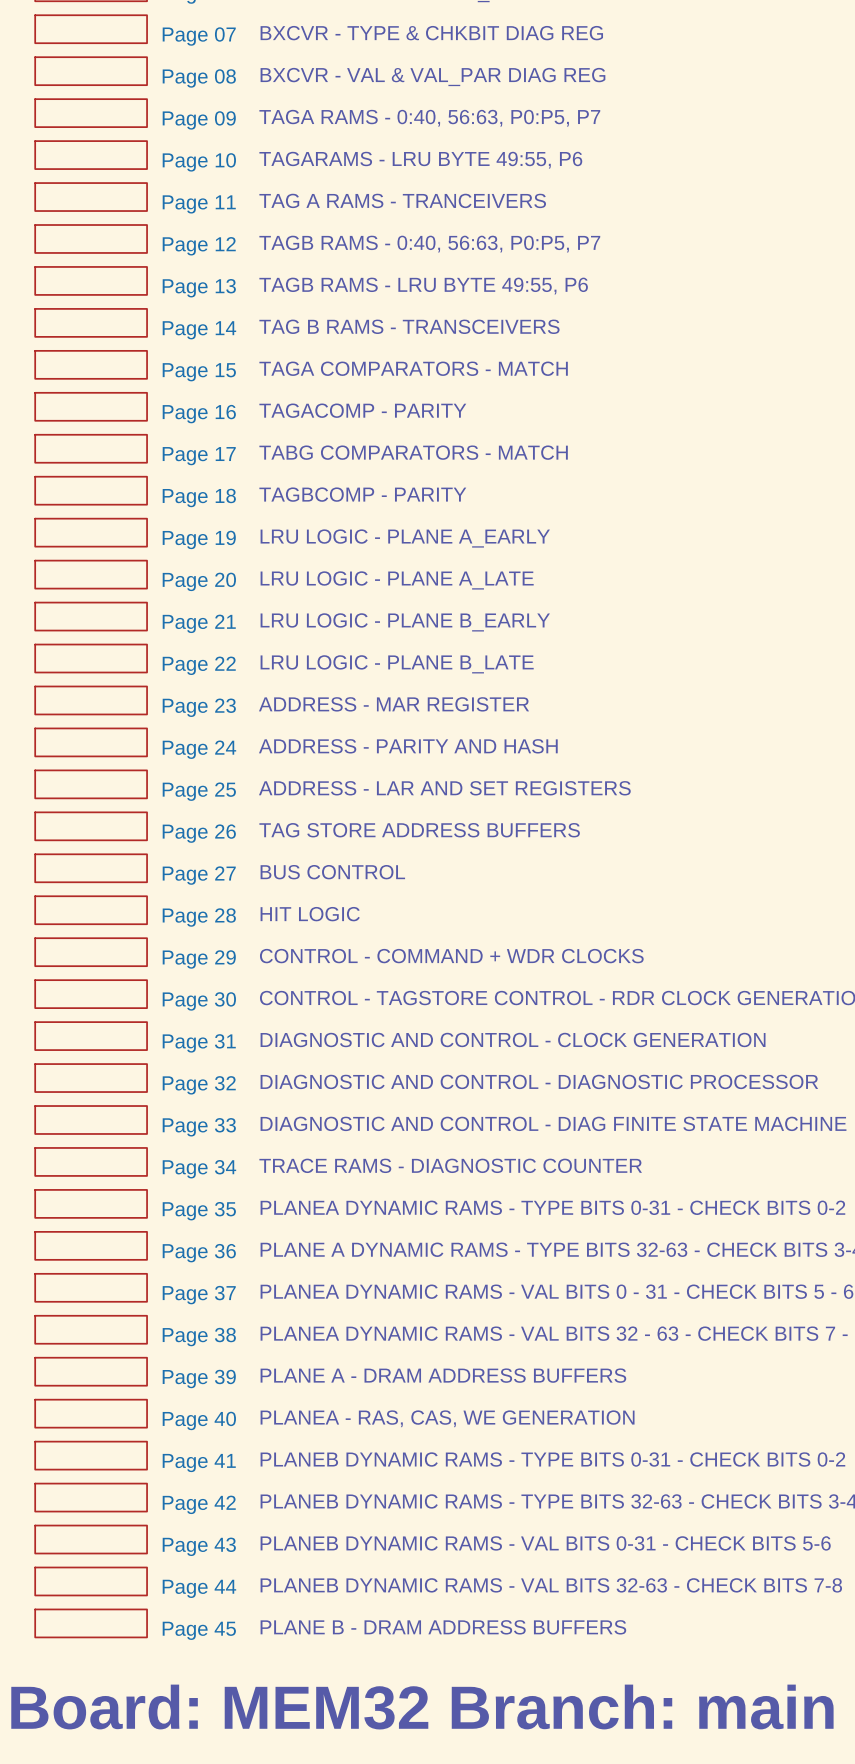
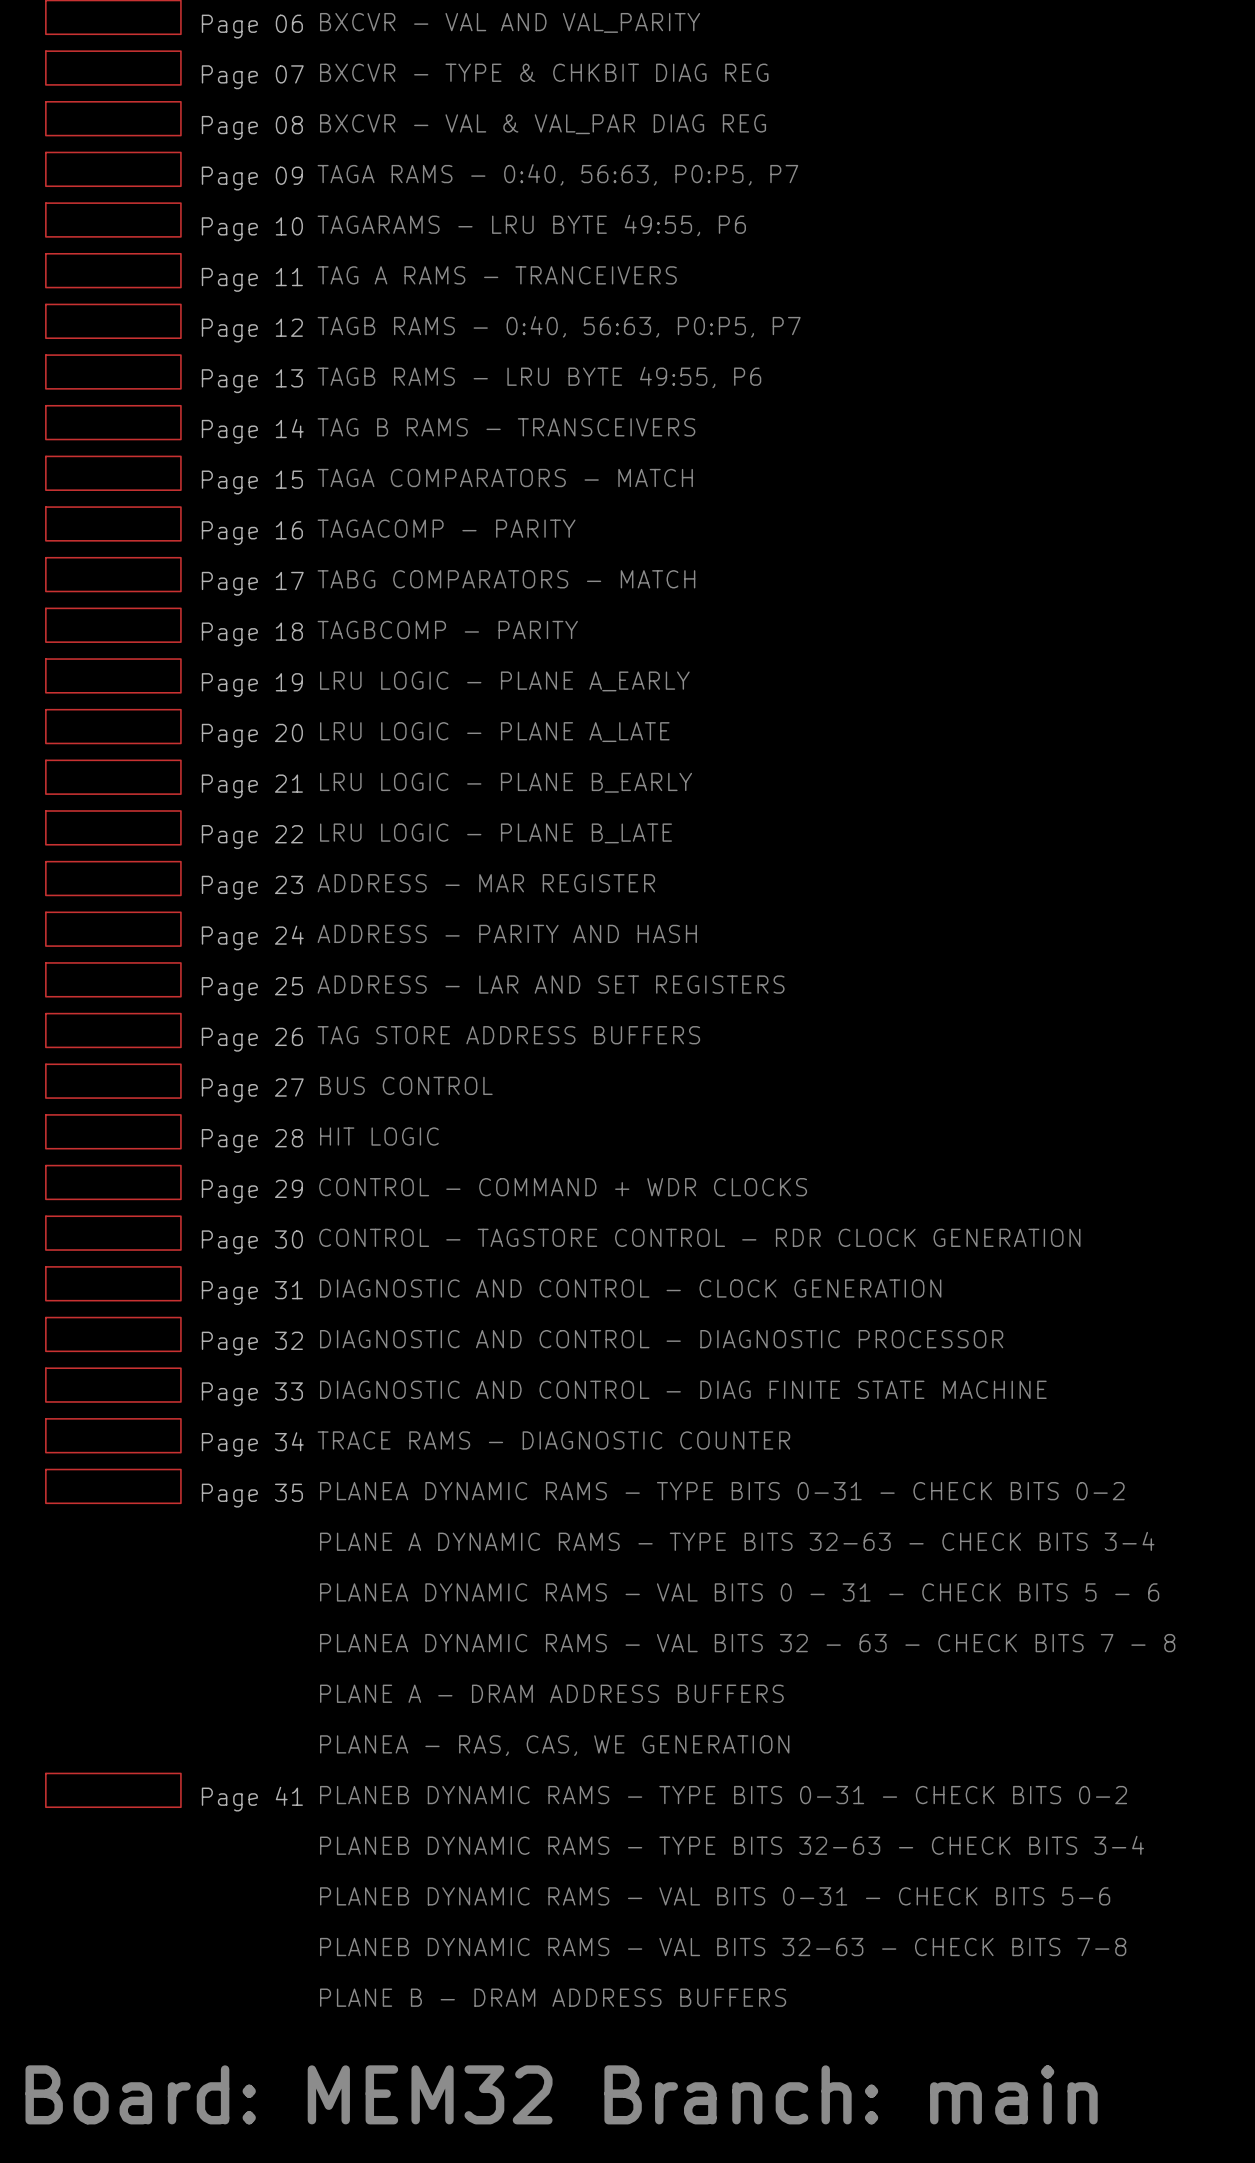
sheet Page 36: (91, 1245) -> none
sheet Page 37: (91, 1287) -> none
sheet Page 38: (91, 1329) -> none
sheet Page 39: (91, 1371) -> none
sheet Page 40: (91, 1413) -> none
sheet Page 42: (91, 1497) -> none
sheet Page 43: (91, 1539) -> none
sheet Page 44: (91, 1581) -> none
sheet Page 45: (91, 1623) -> none

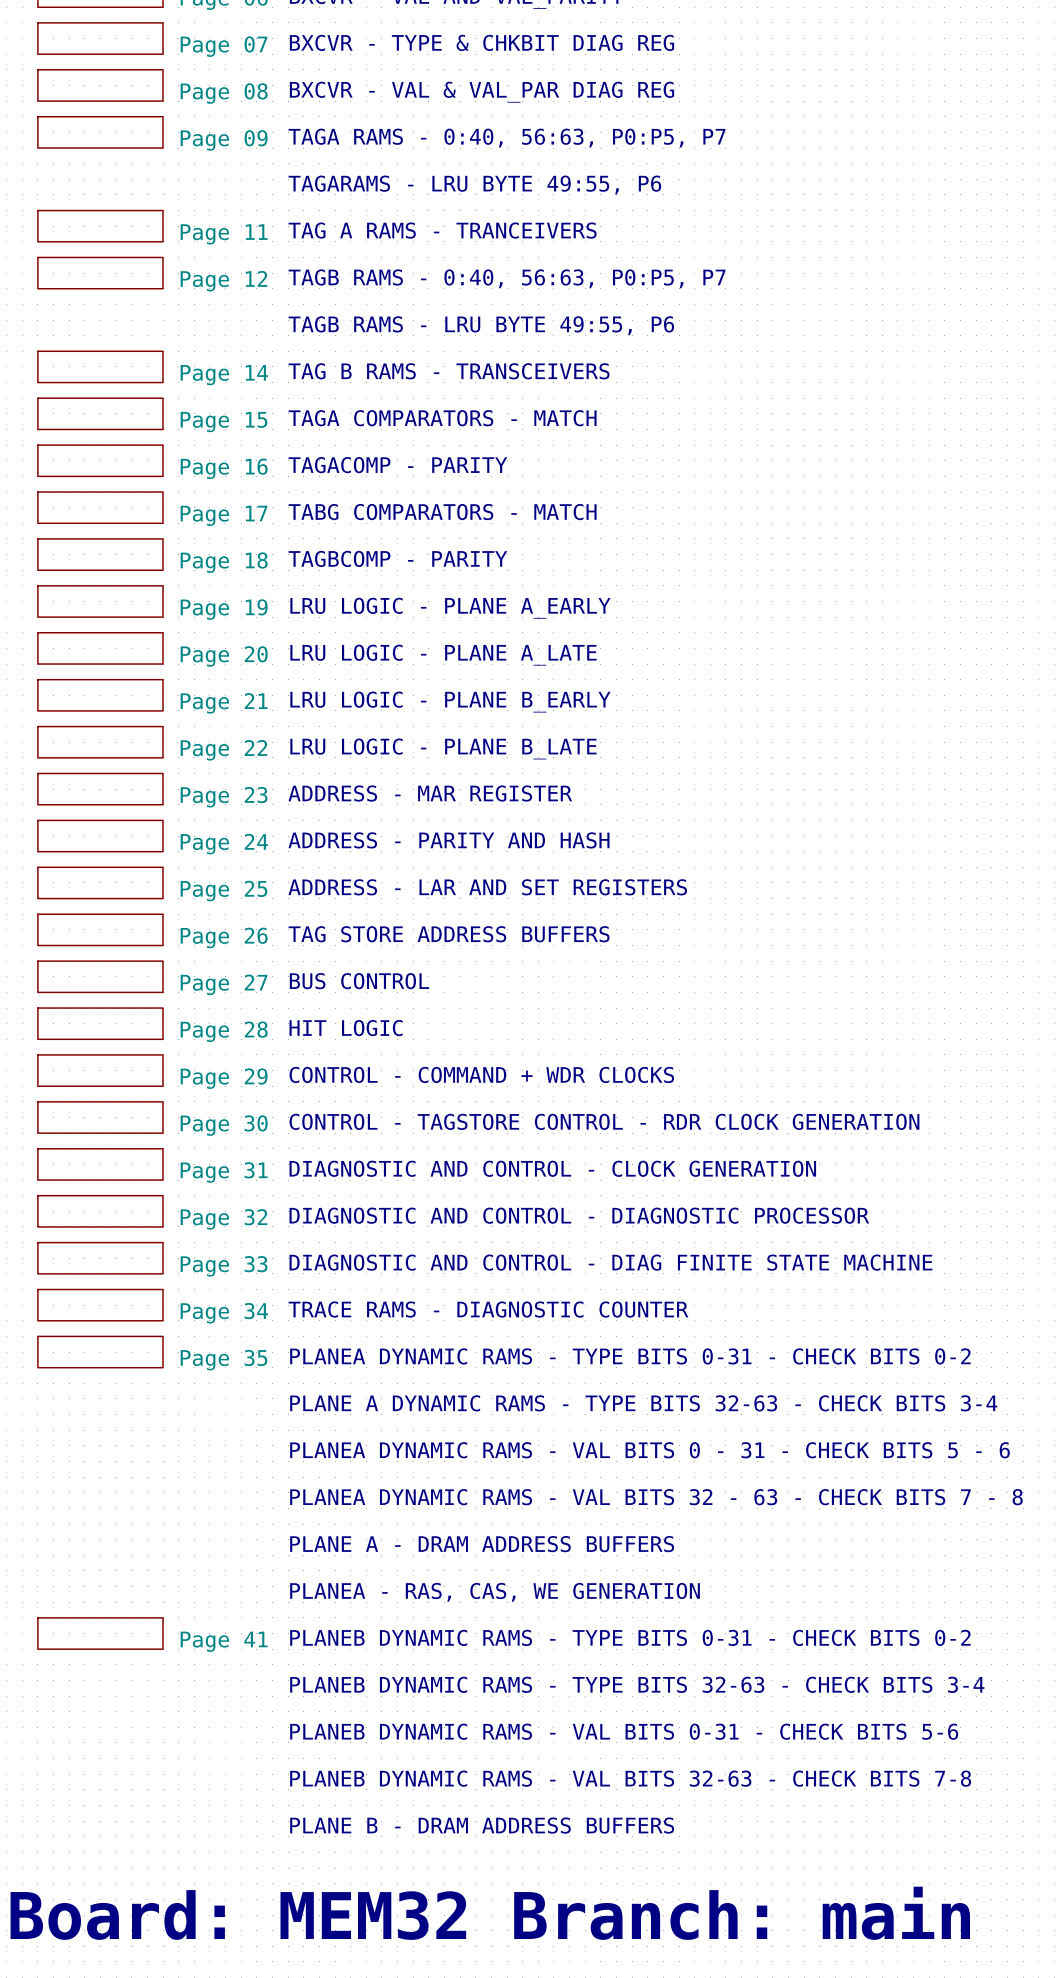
sheet Page 10: (113, 220) -> none
sheet Page 13: (113, 371) -> none

